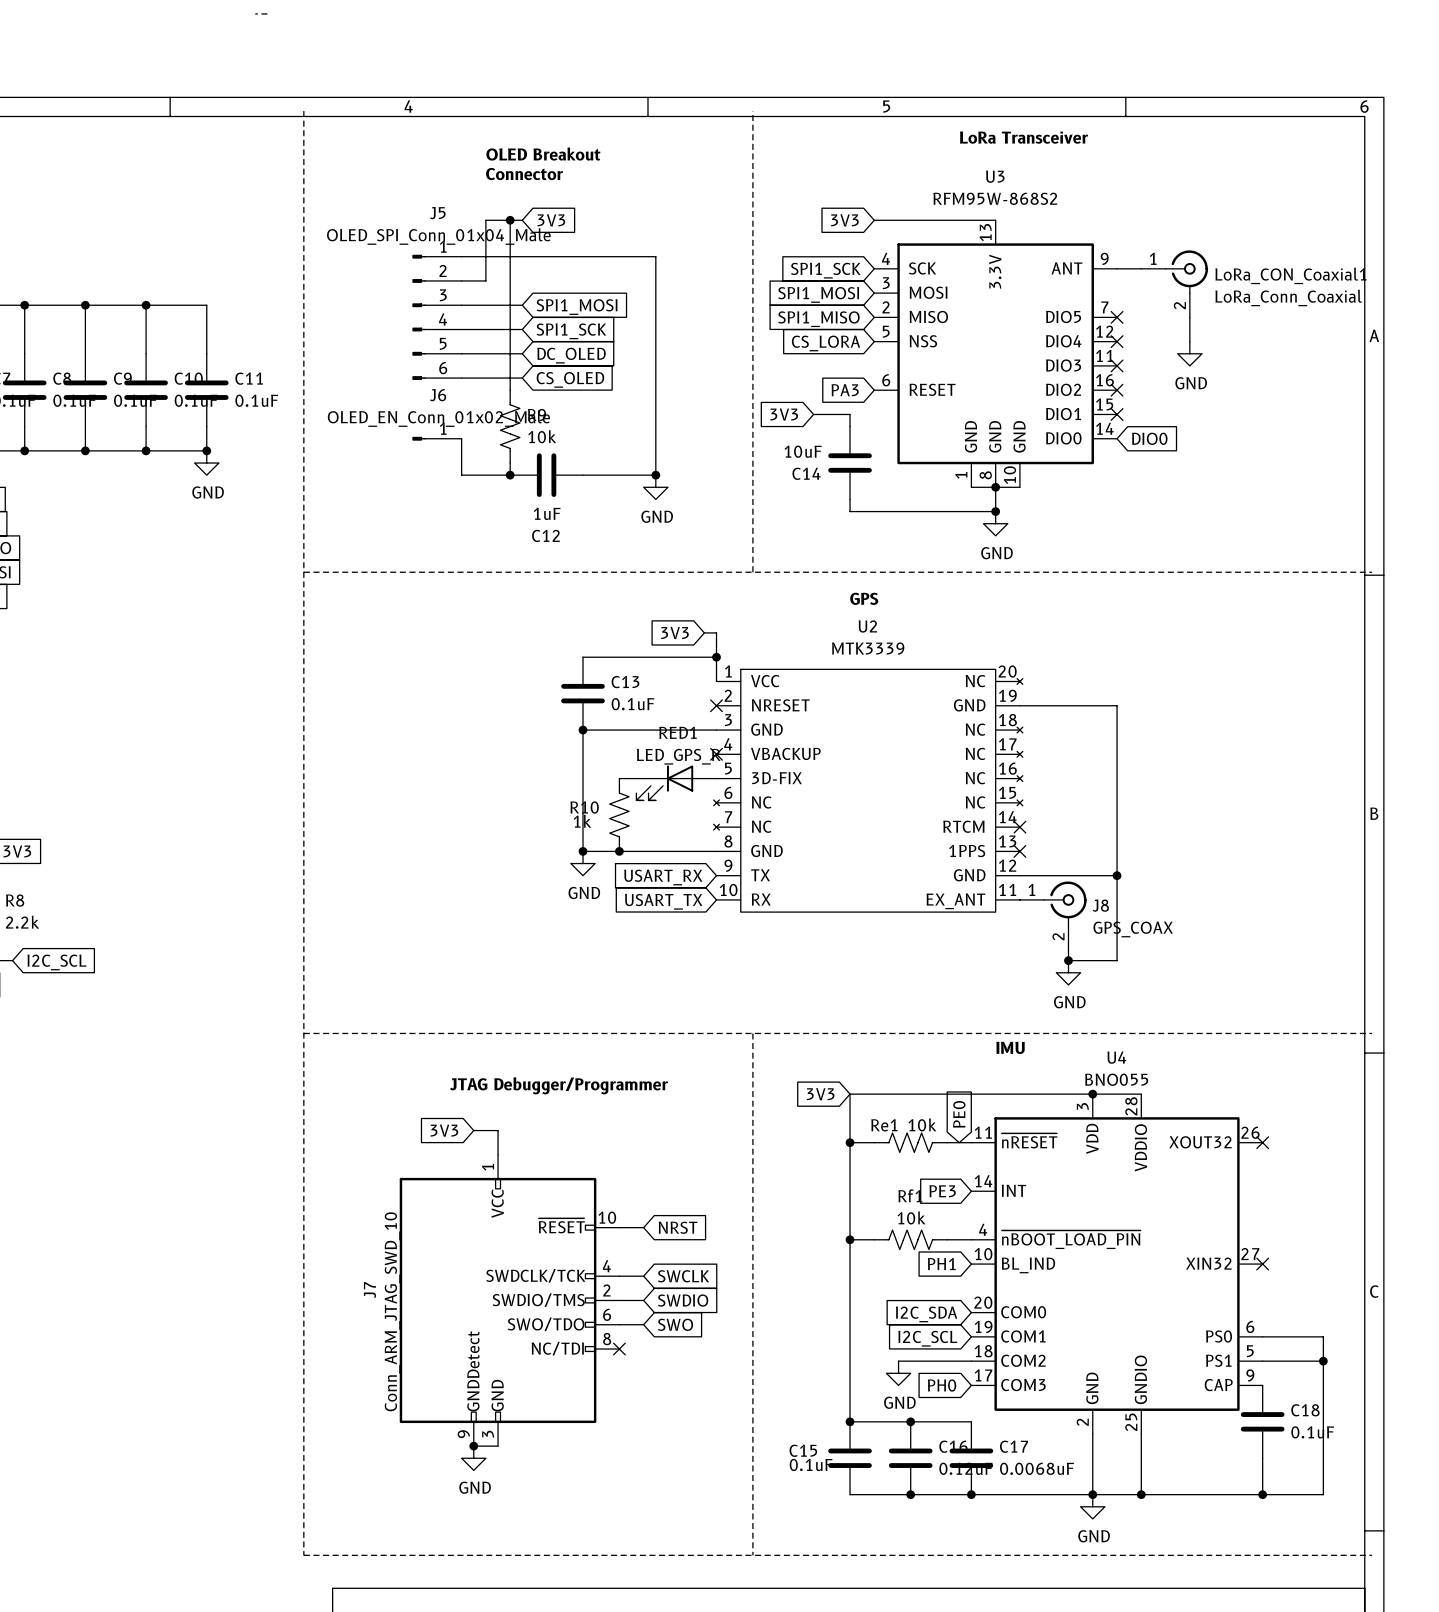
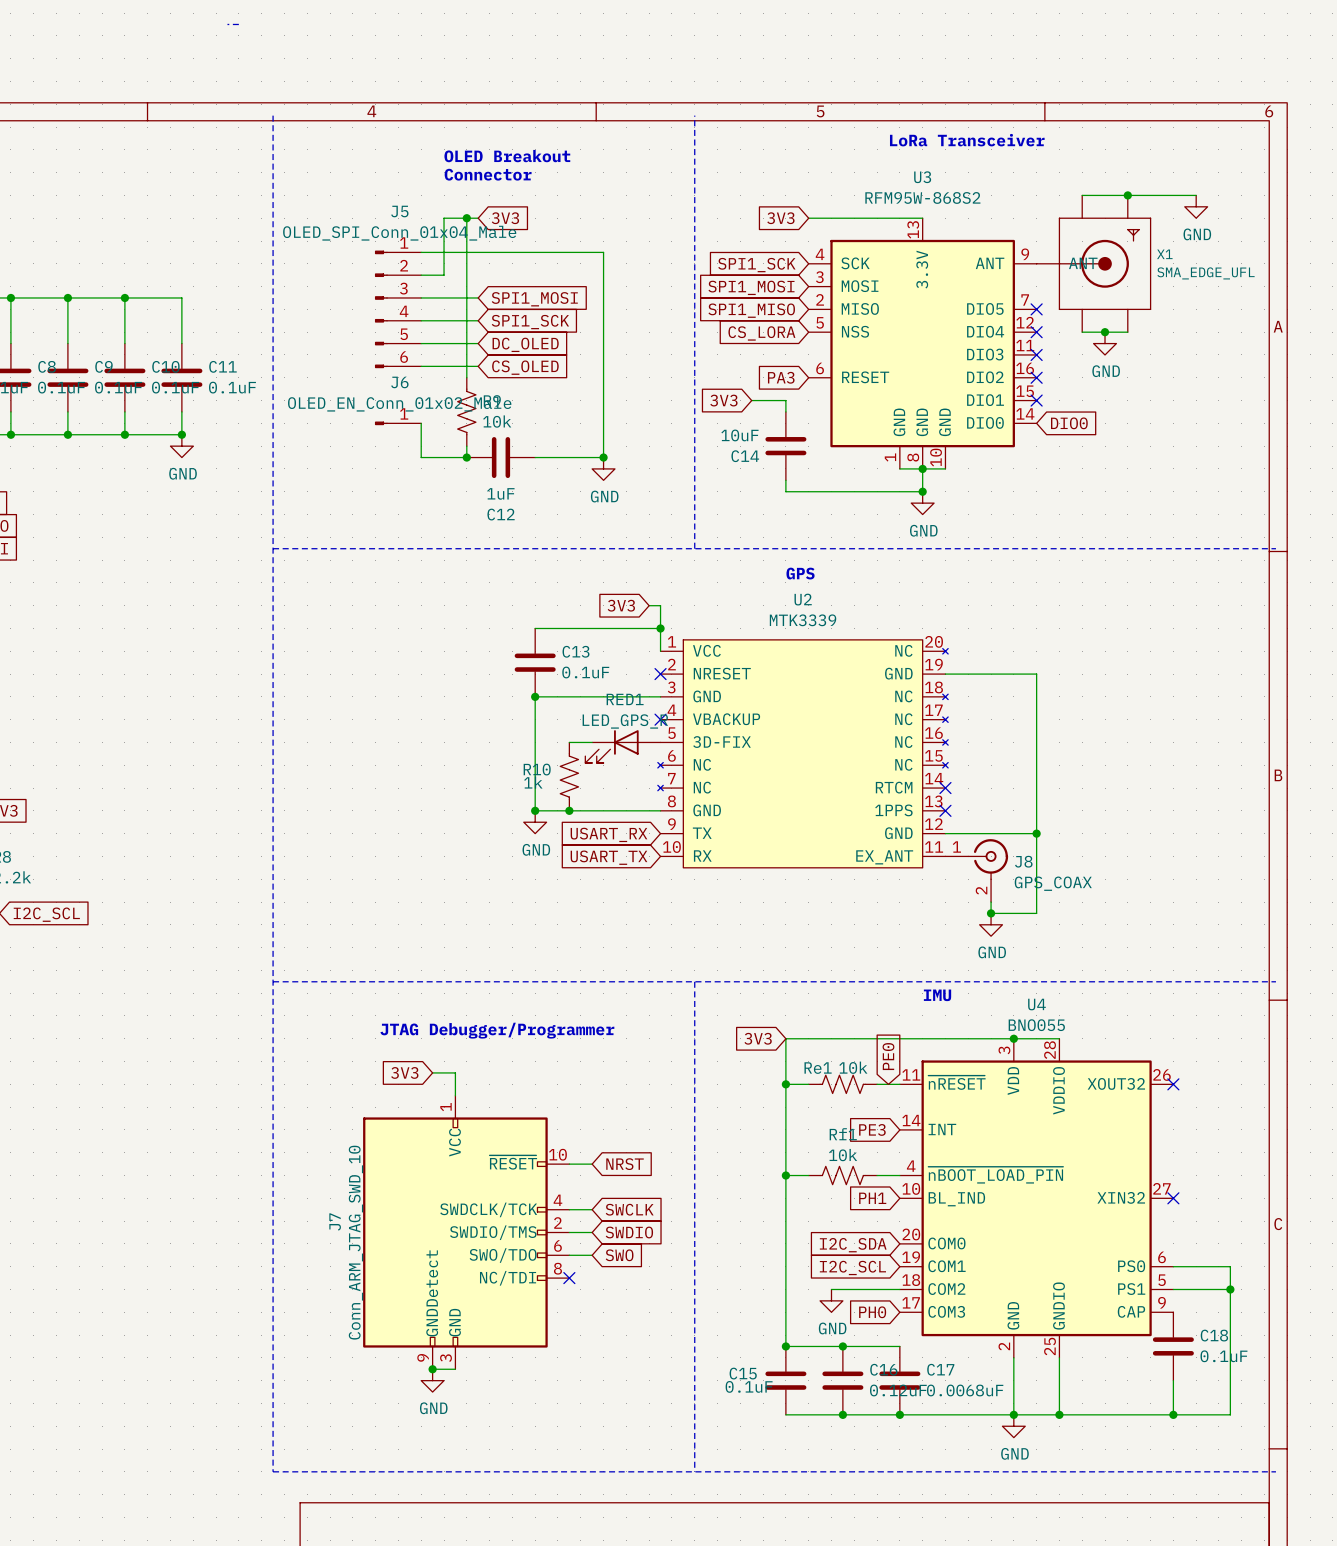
wire: none -> (1082, 195) (1196, 195)
junction: none -> (1127, 195)
power symbol: none -> GND (1196, 206)
X1: none -> SMA_EDGE_UFL (1093, 263)
LoRa_CON_Coaxial1: LoRa_Conn_Coaxial (1174, 283) -> none
wire: (1189, 317) (1189, 341) -> none
wire: none -> (1082, 332) (1127, 332)
junction: none -> (1105, 332)

